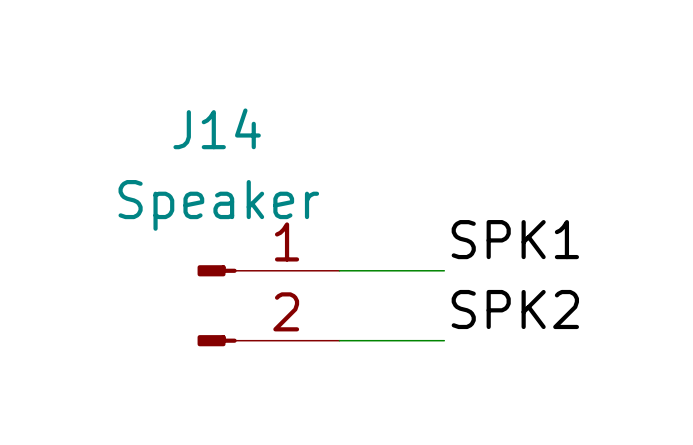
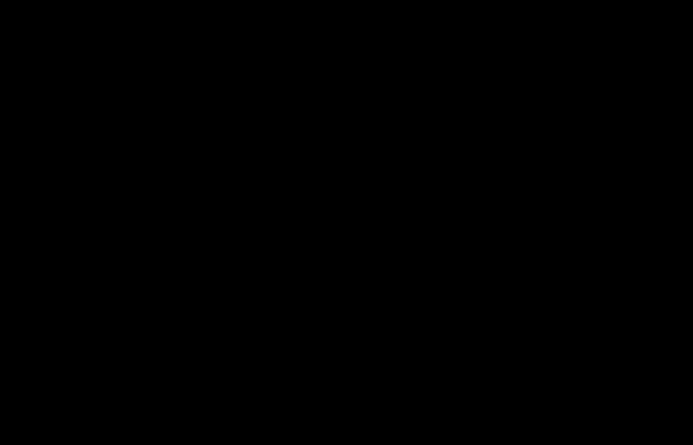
label: SPK1 (515, 239) -> none
wire: (339, 270) (444, 270) -> none
J14: Speaker (268, 305) -> none
label: SPK2 (515, 309) -> none
wire: (339, 340) (444, 340) -> none

